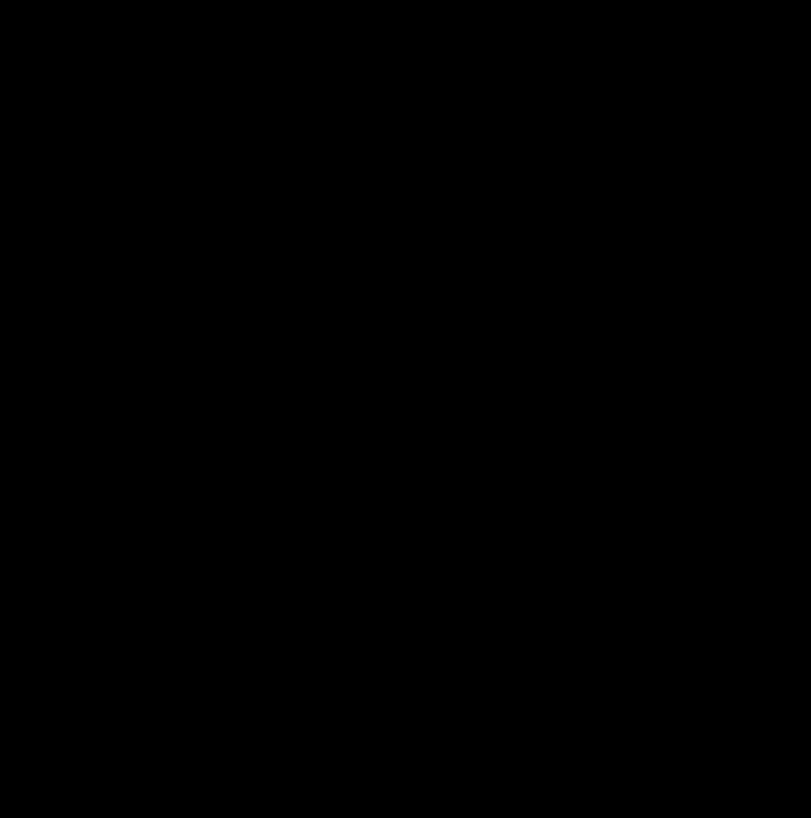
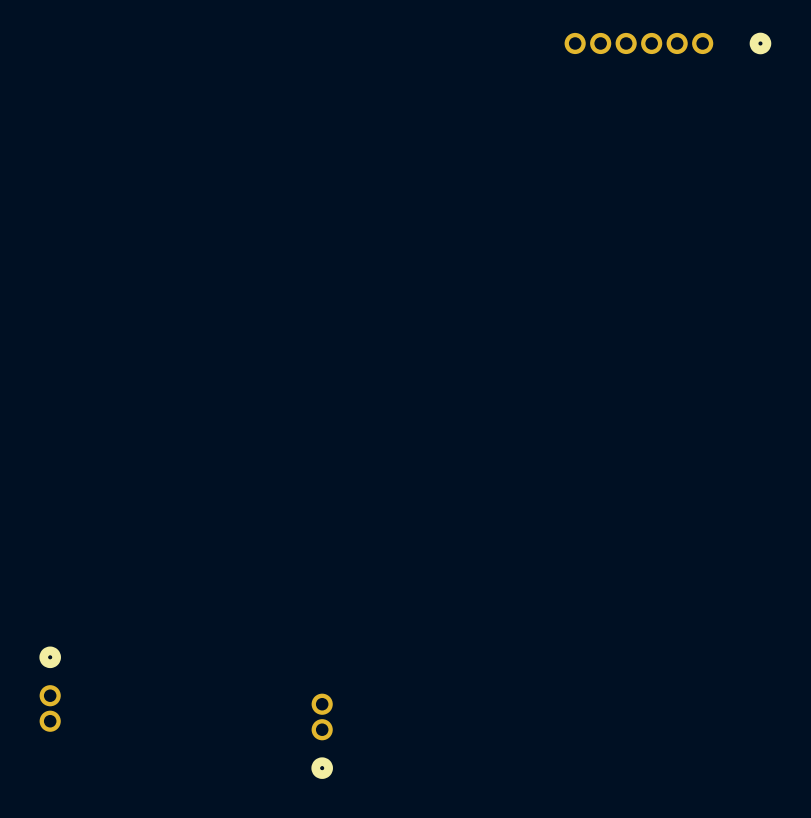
part: none -> (667, 43)
part: none -> (50, 689)
part: none -> (322, 736)

